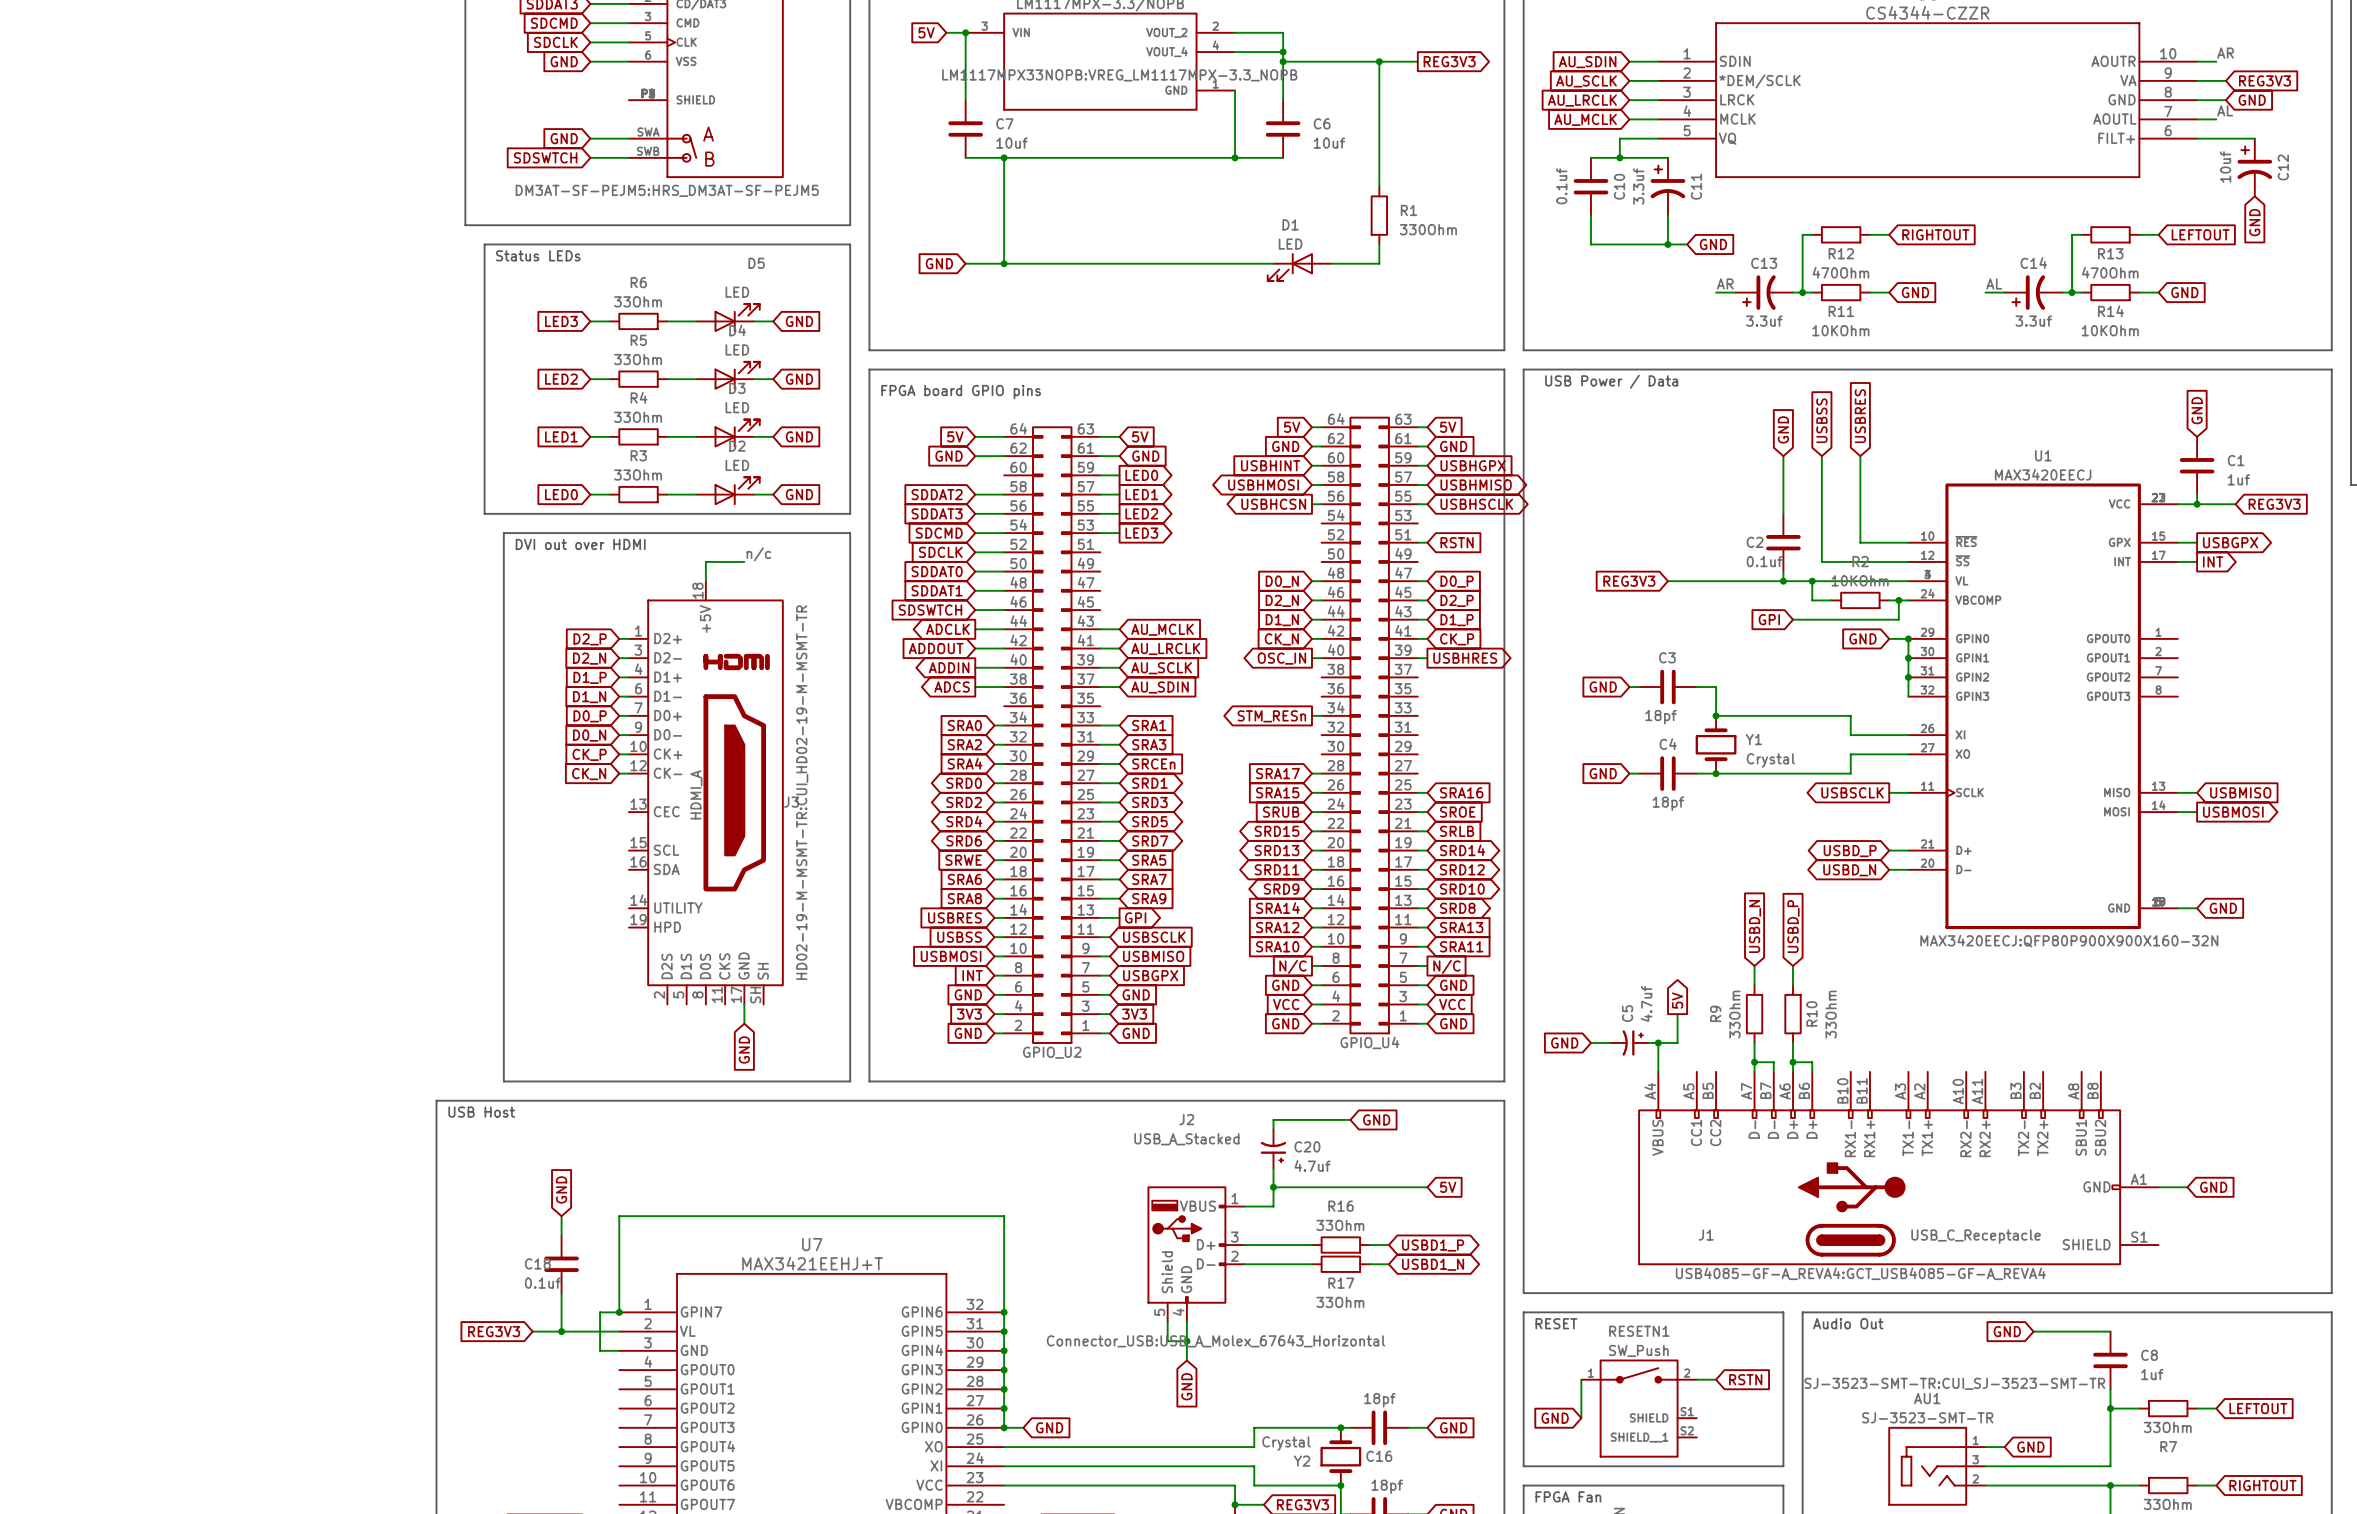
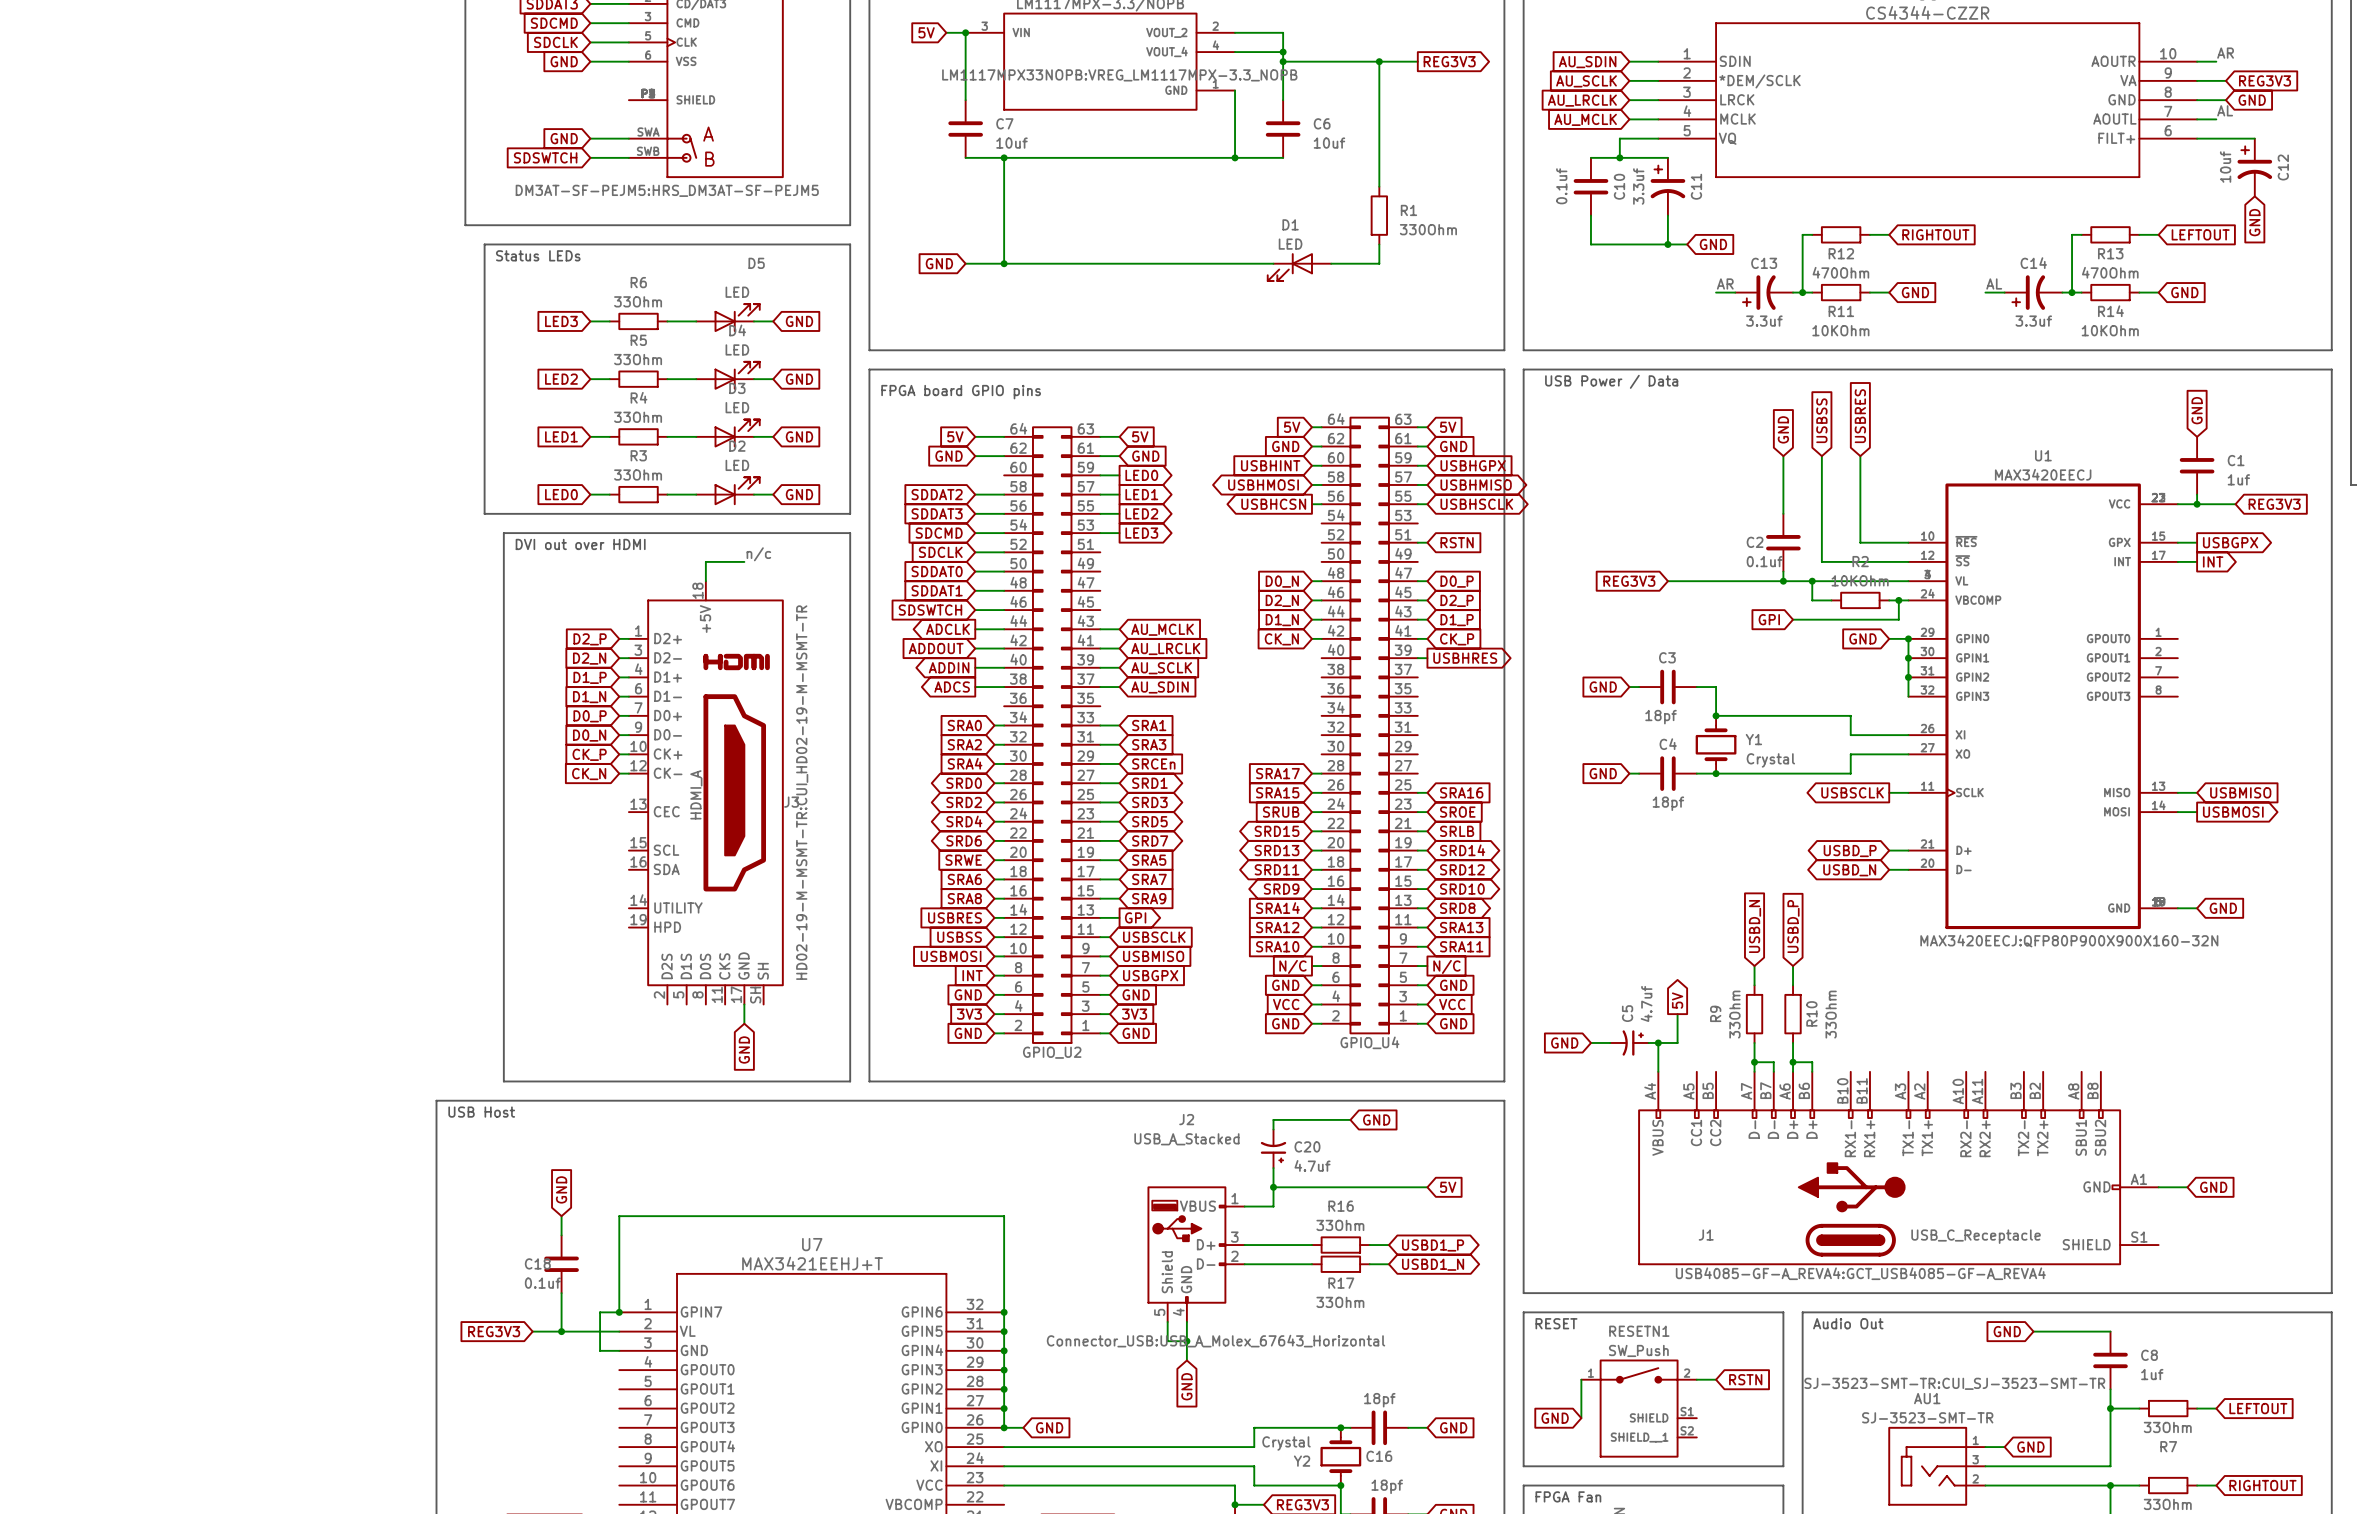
global label: OSC_IN (1281, 658) -> none
wire: (1311, 658) (1321, 658) -> none
wire: (1311, 715) (1321, 715) -> none
global label: STM_RESn (1271, 716) -> none

